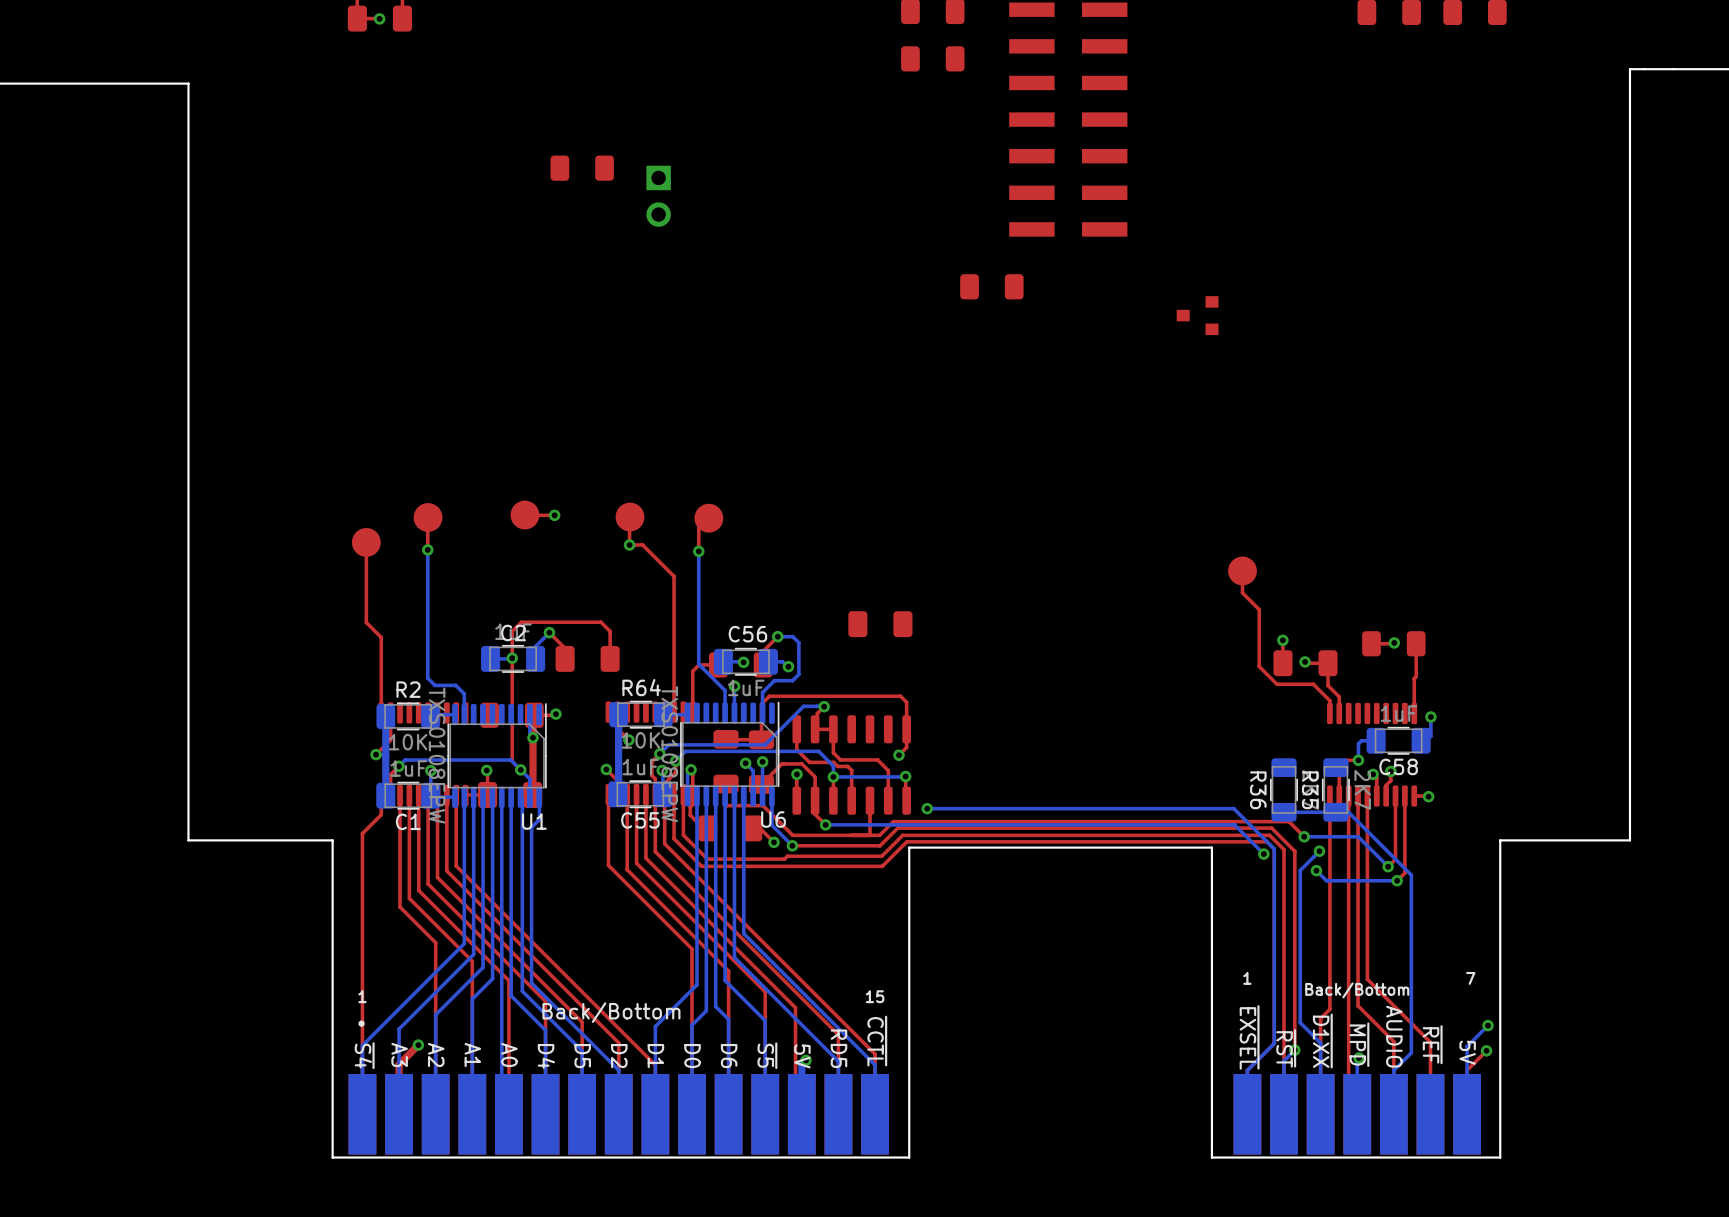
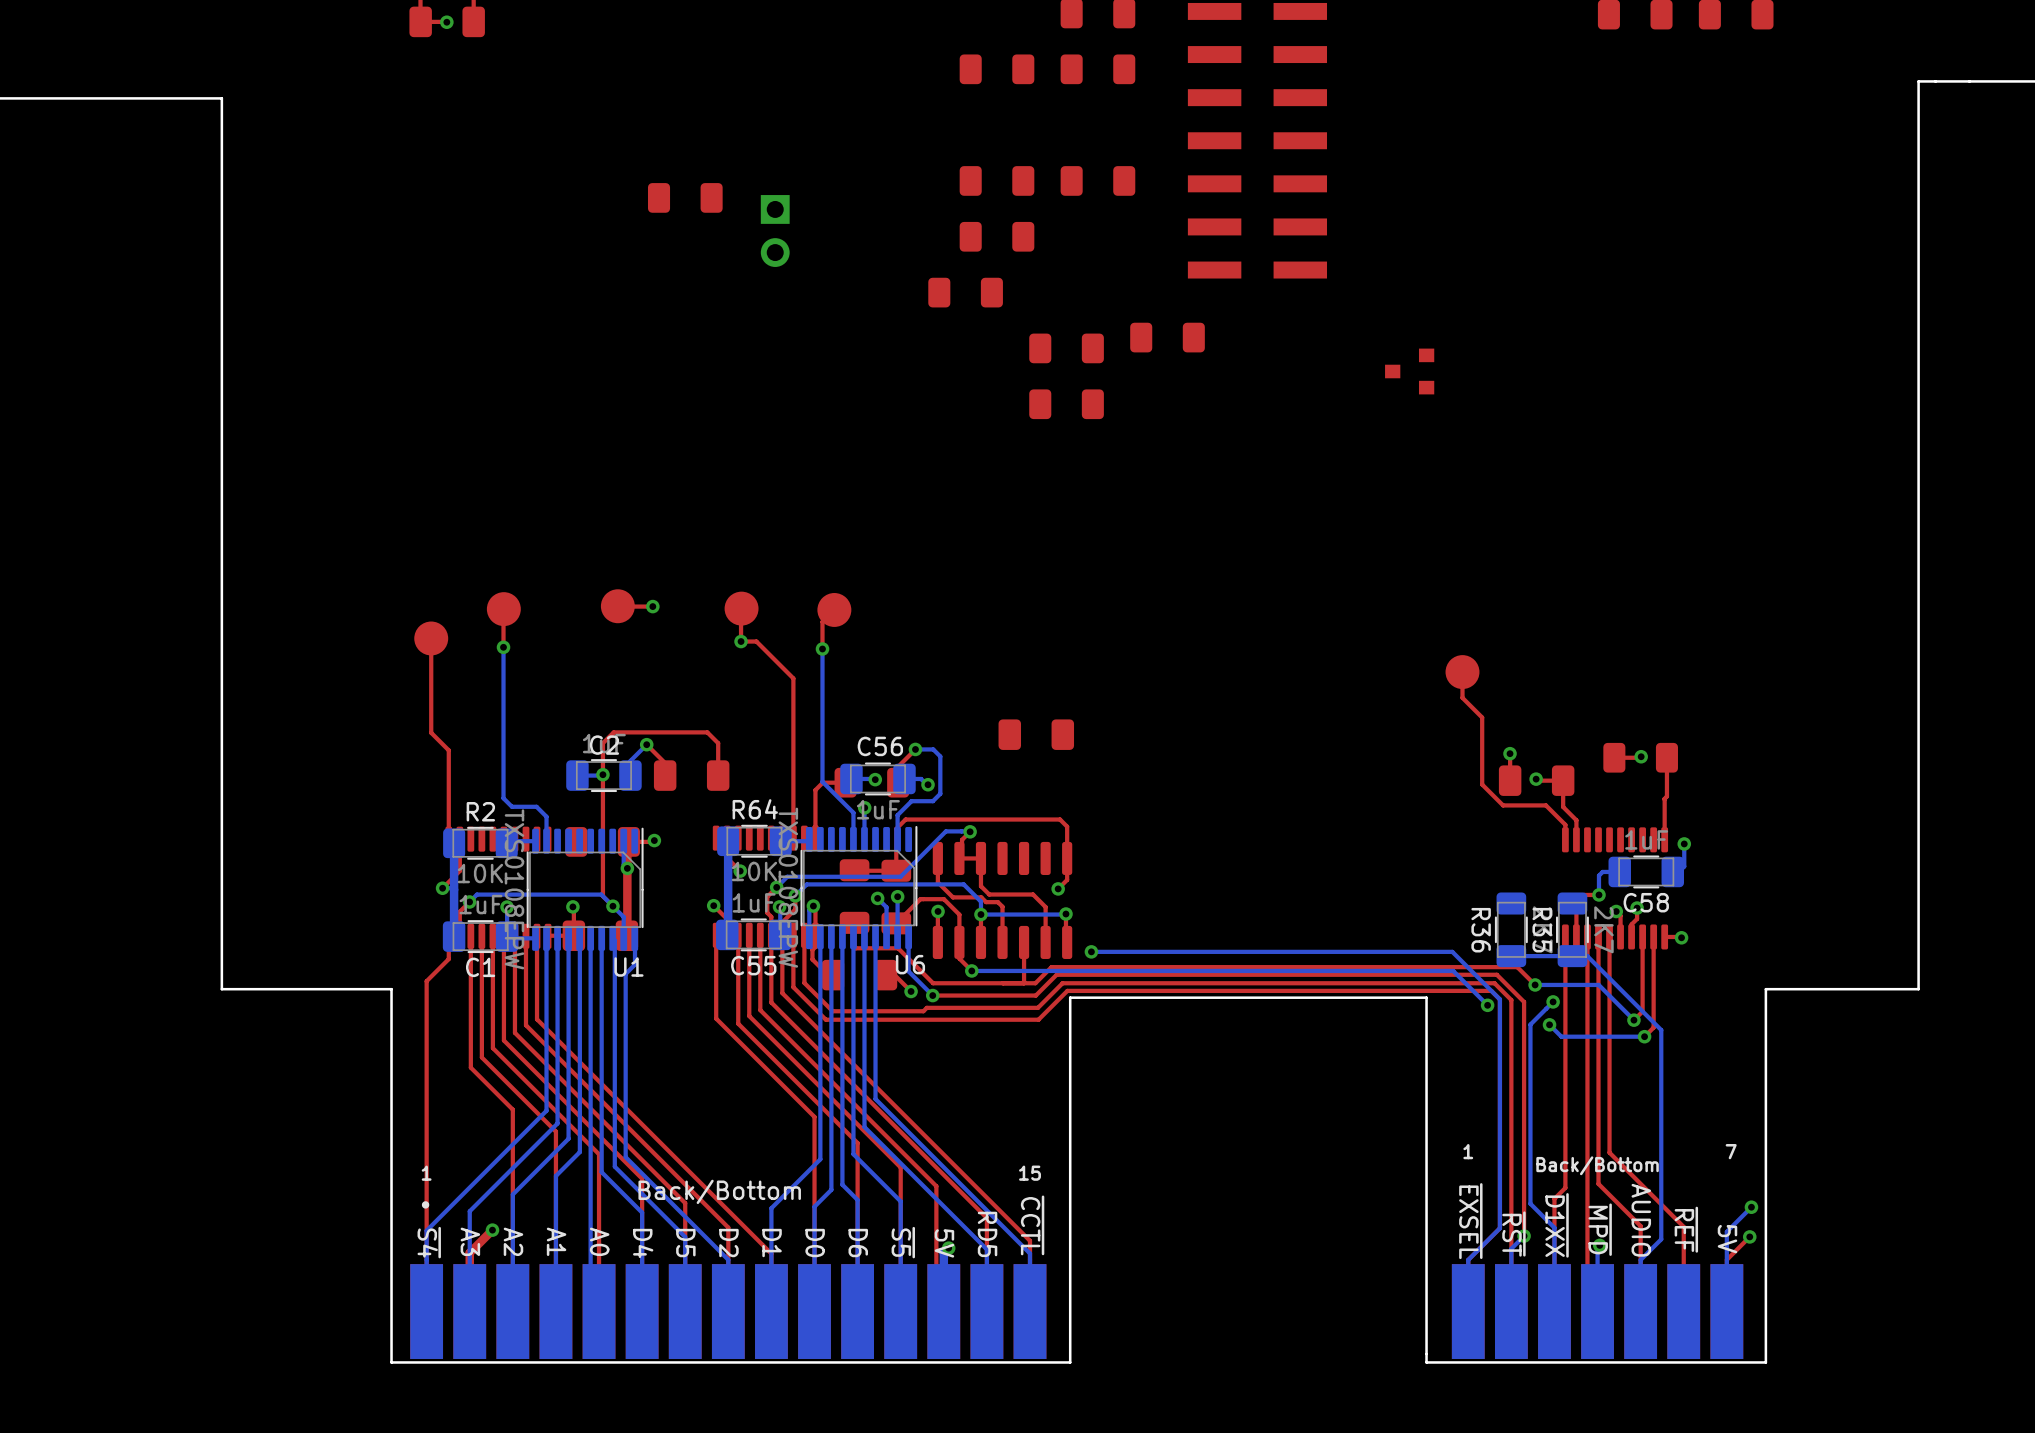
part: none -> (997, 69)
part: none -> (997, 180)
part: none -> (1097, 180)
part: none -> (997, 236)
part: none -> (965, 292)
part: none -> (1066, 348)
part: none -> (1066, 404)

